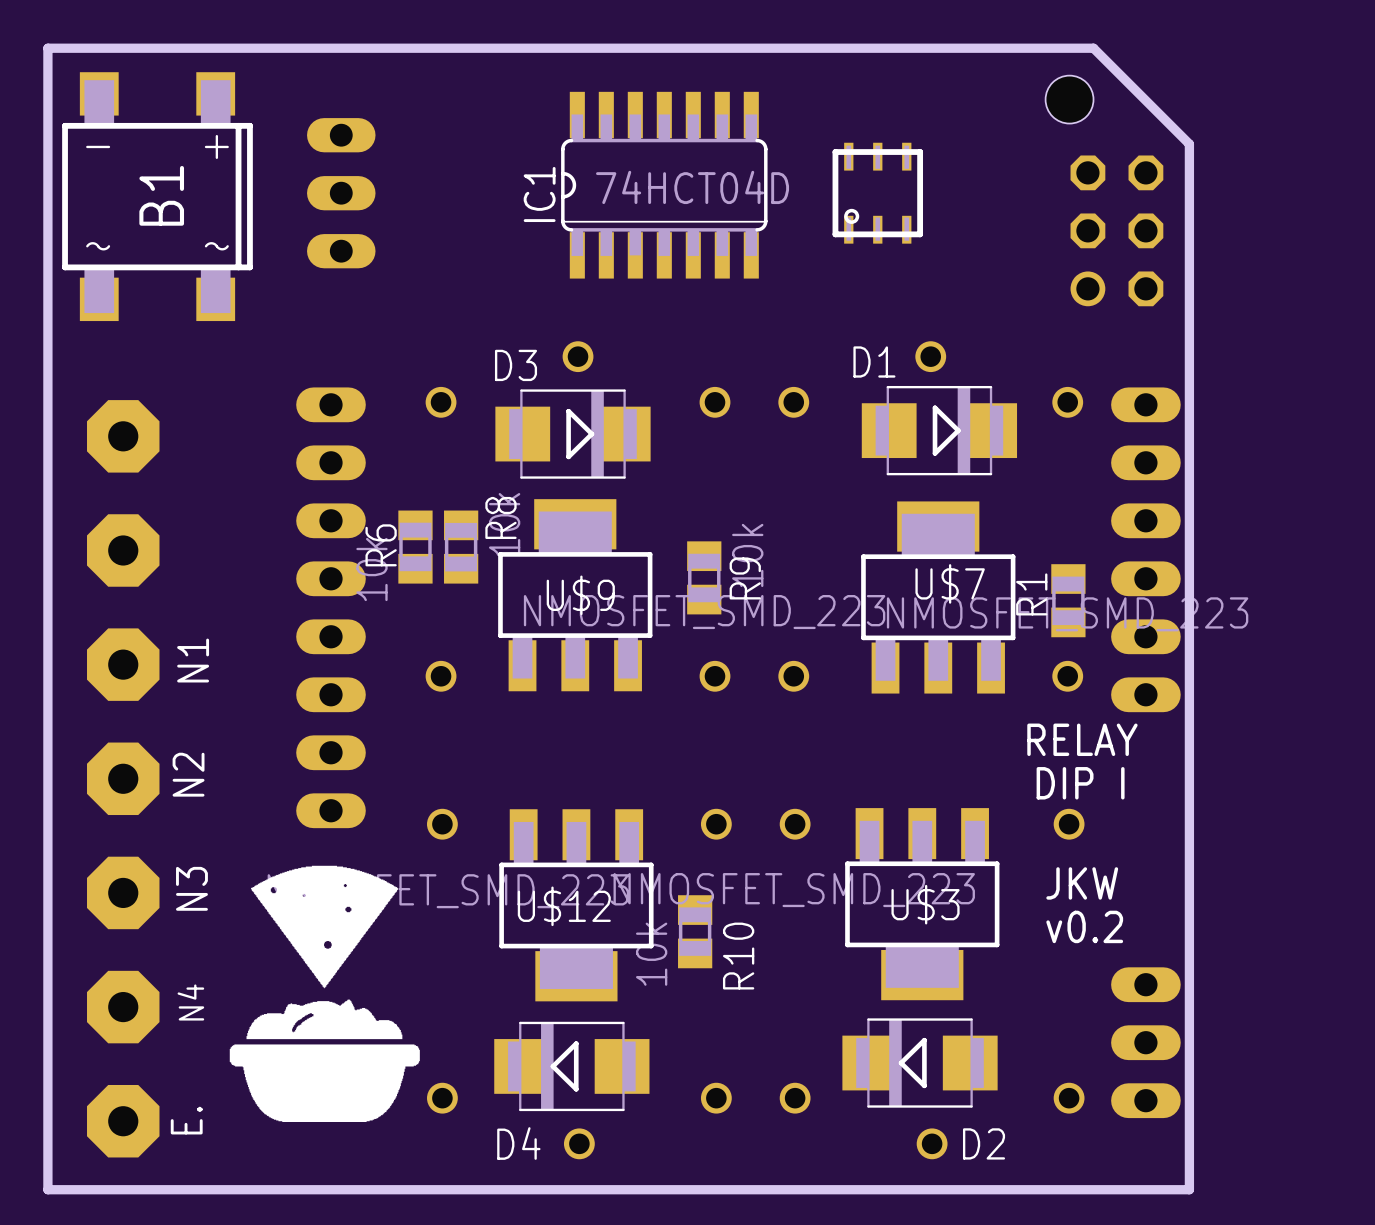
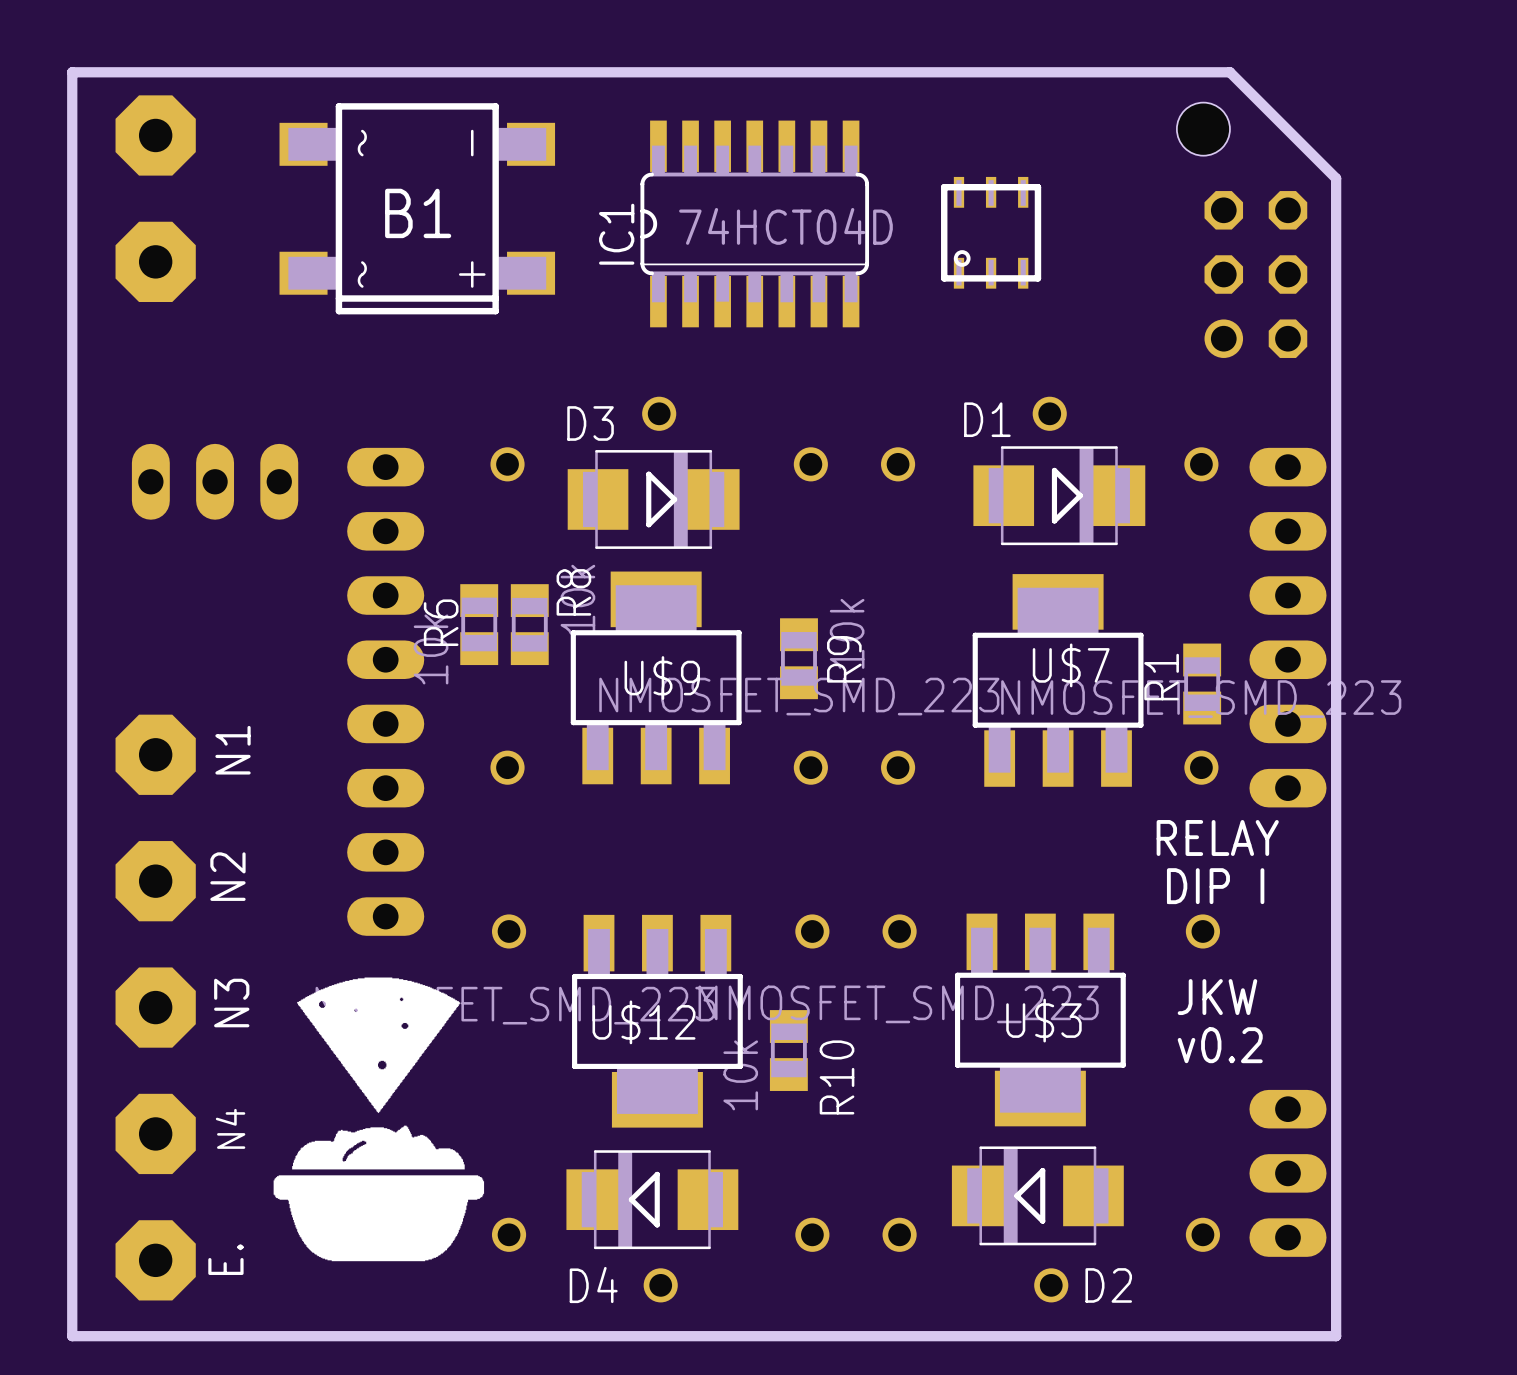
part: none -> (155, 135)
part rotation: 0° (341, 193) -> 90° clockwise (215, 481)
part position: (341, 193) -> (215, 481)
B1 rotation: 0° (157, 196) -> 90° clockwise (417, 208)
B1 position: (157, 196) -> (417, 208)
part: none -> (155, 261)
part: (123, 436) -> none
part: (123, 550) -> none

